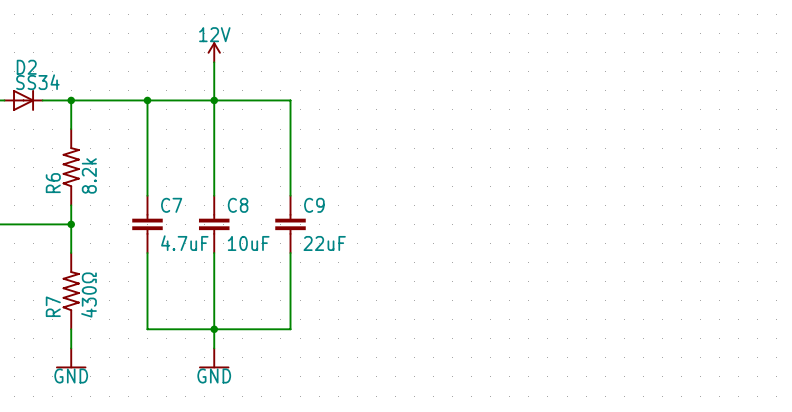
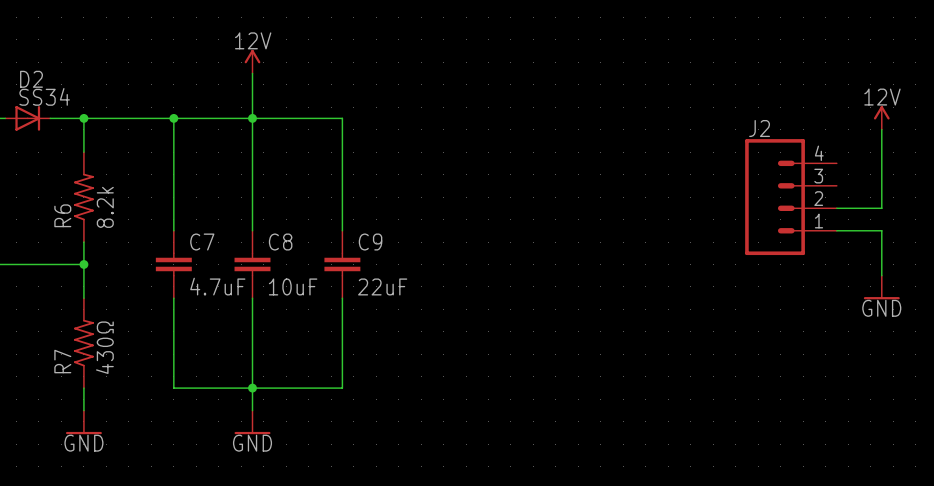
power symbol: none -> 12V (881, 117)
wire: none -> (881, 129) (881, 208) (836, 208)
J2: none -> (790, 197)
wire: none -> (836, 230) (881, 230) (881, 275)
power symbol: none -> GND (881, 287)

